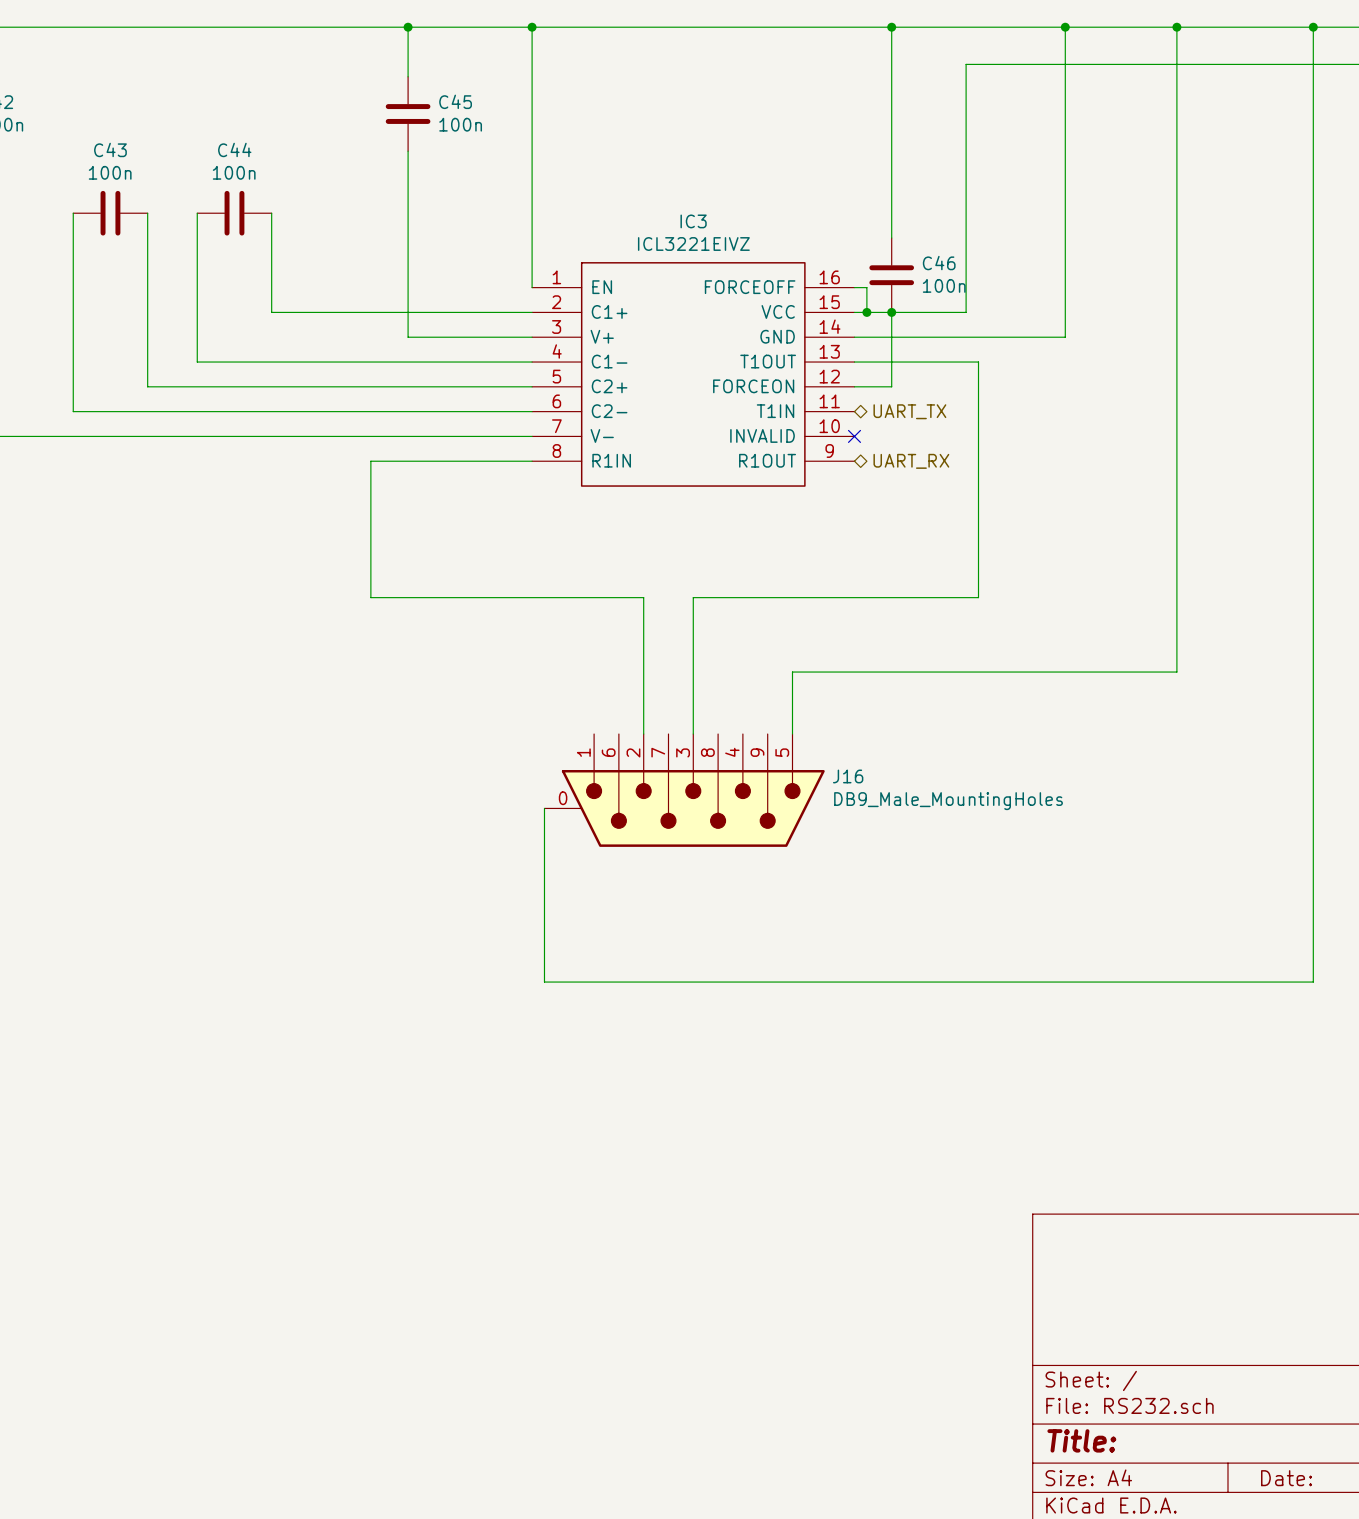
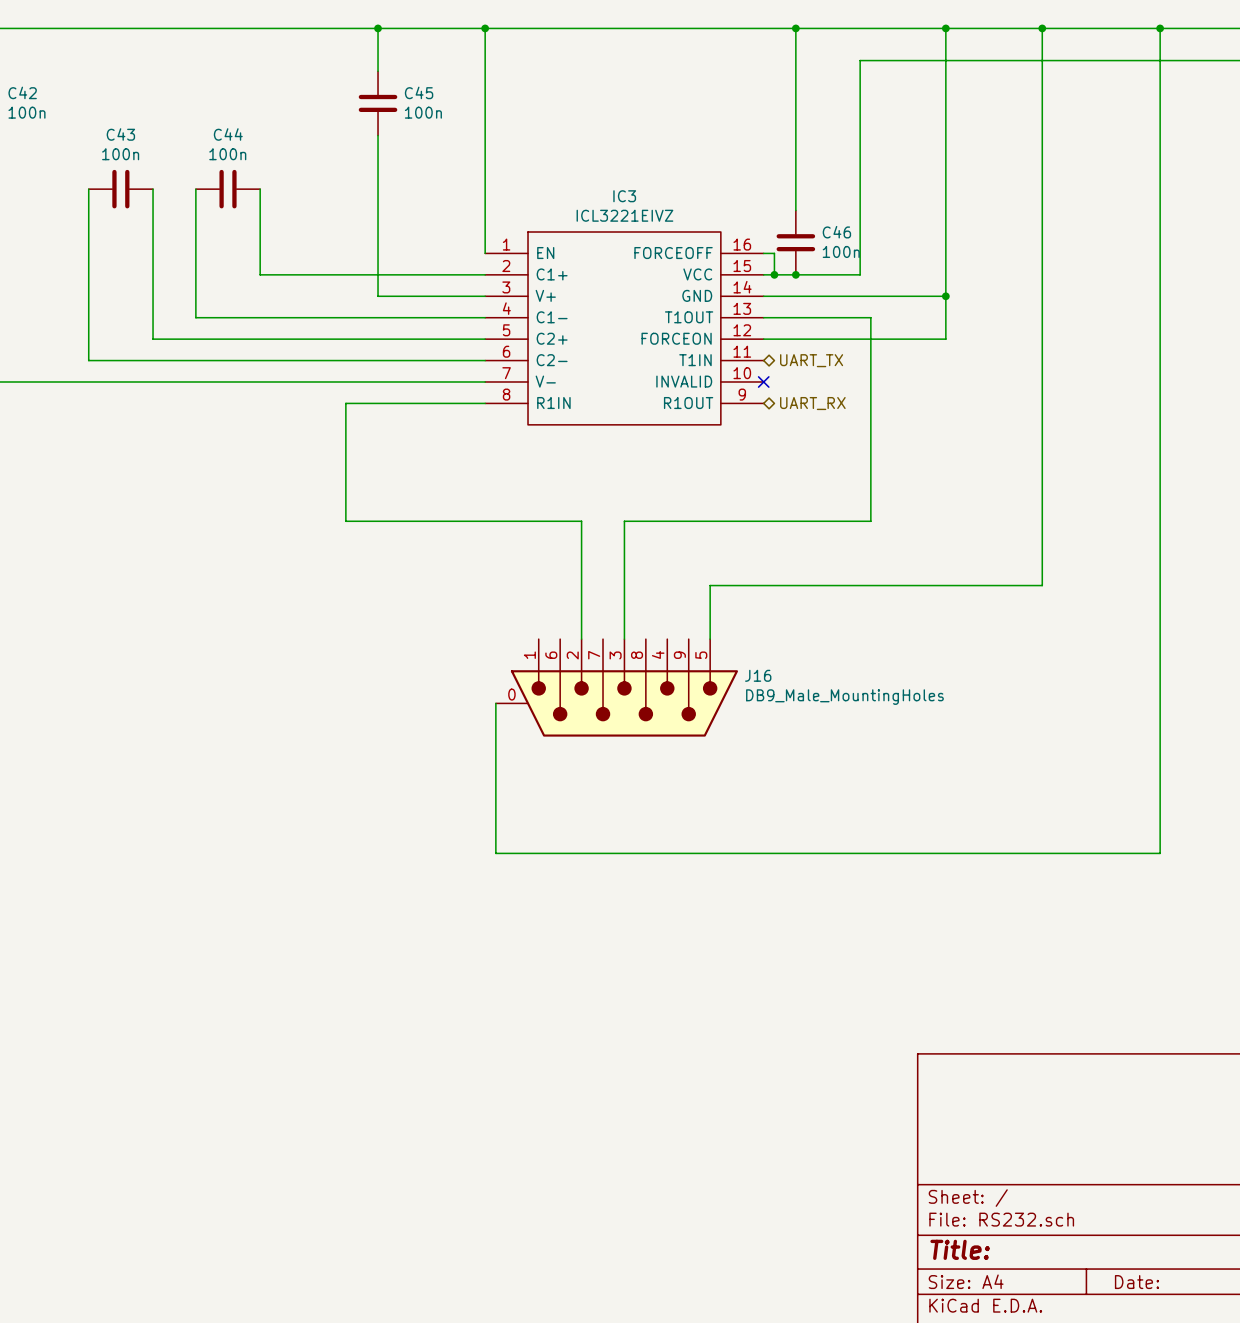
wire: (891, 312) (891, 386) -> (945, 296) (945, 339) (795, 339)
junction: none -> (945, 296)

